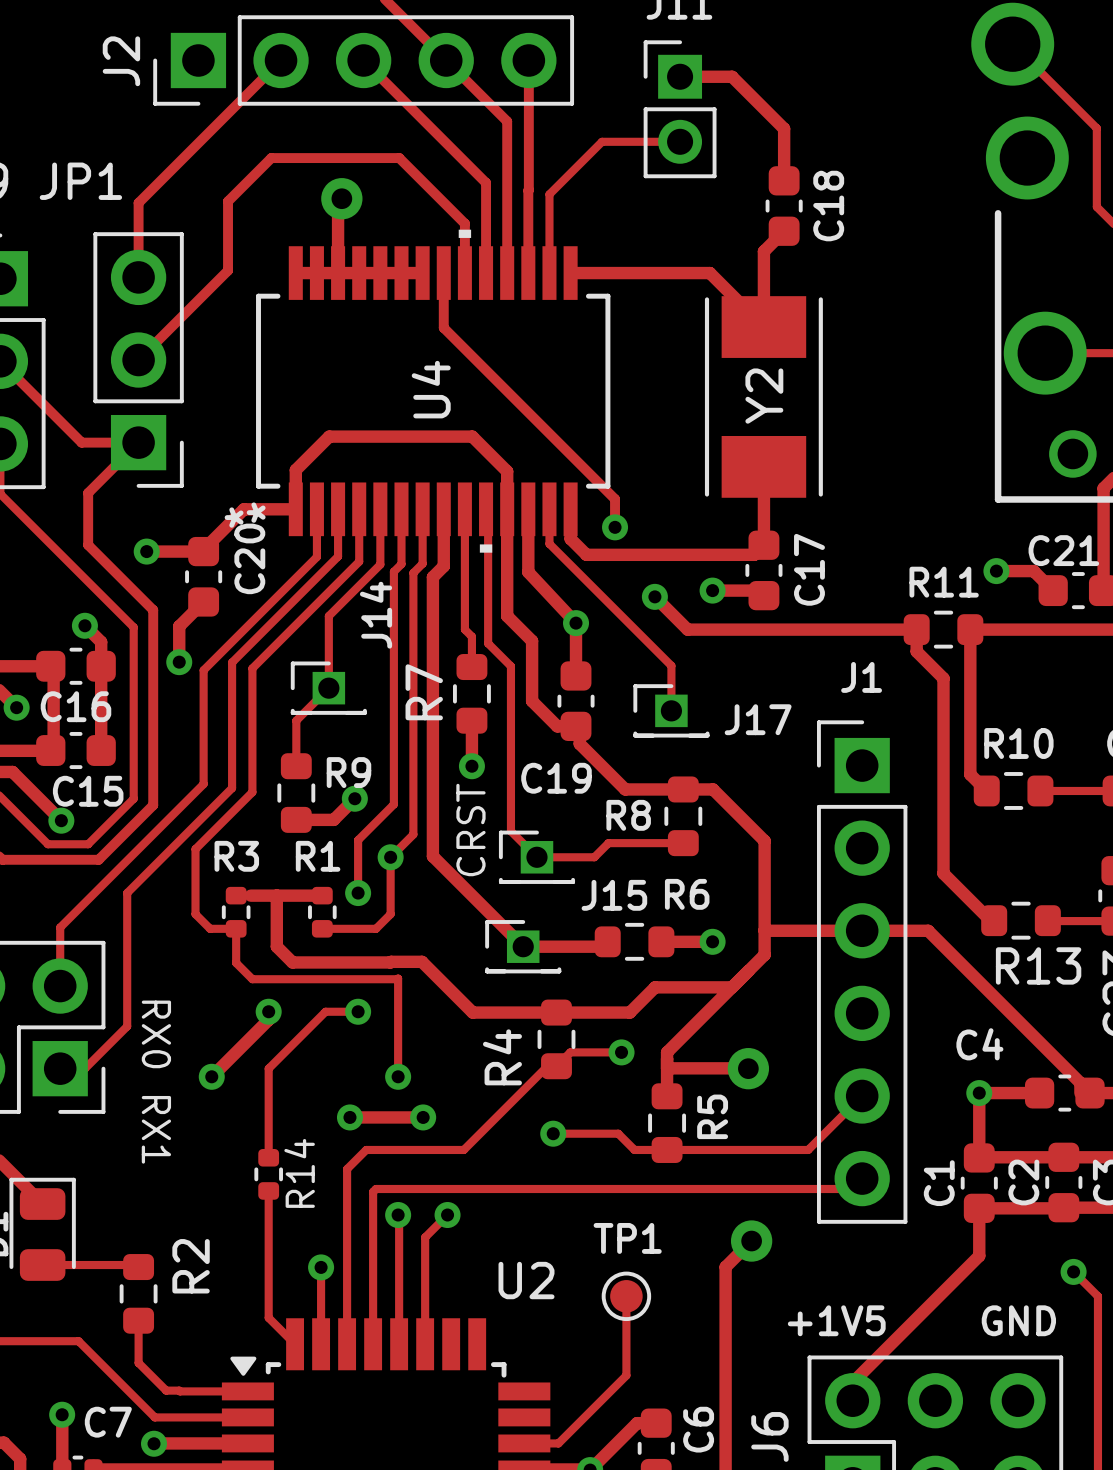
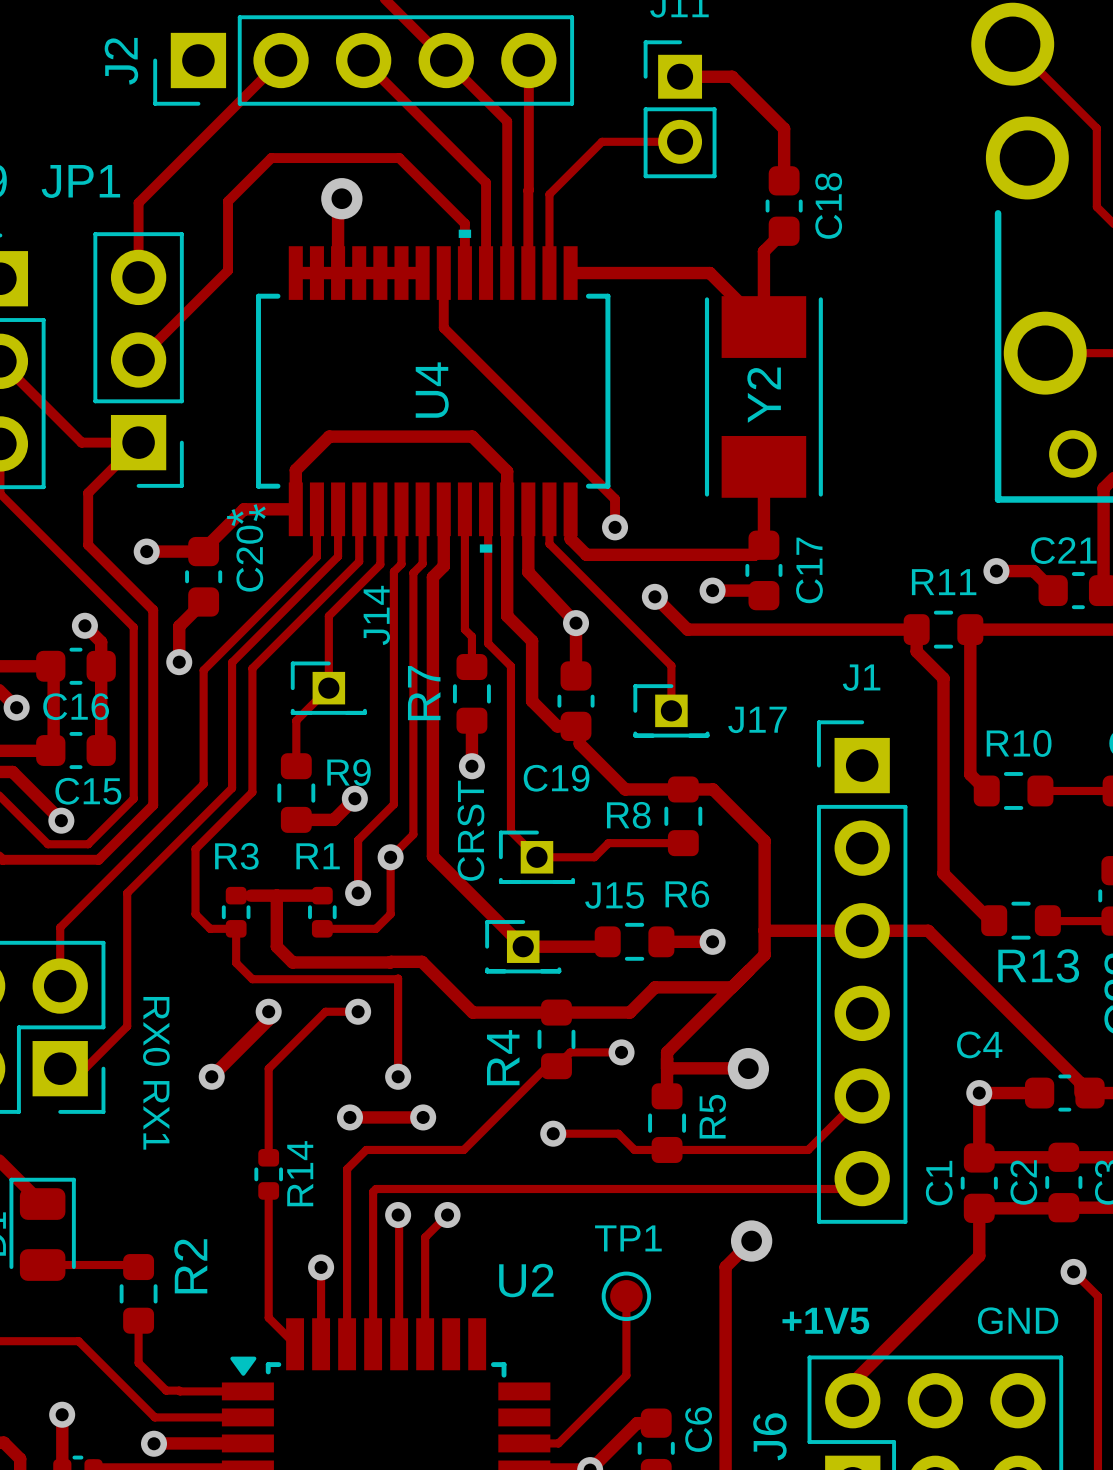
C7 name: C7 (108, 1422) -> none

